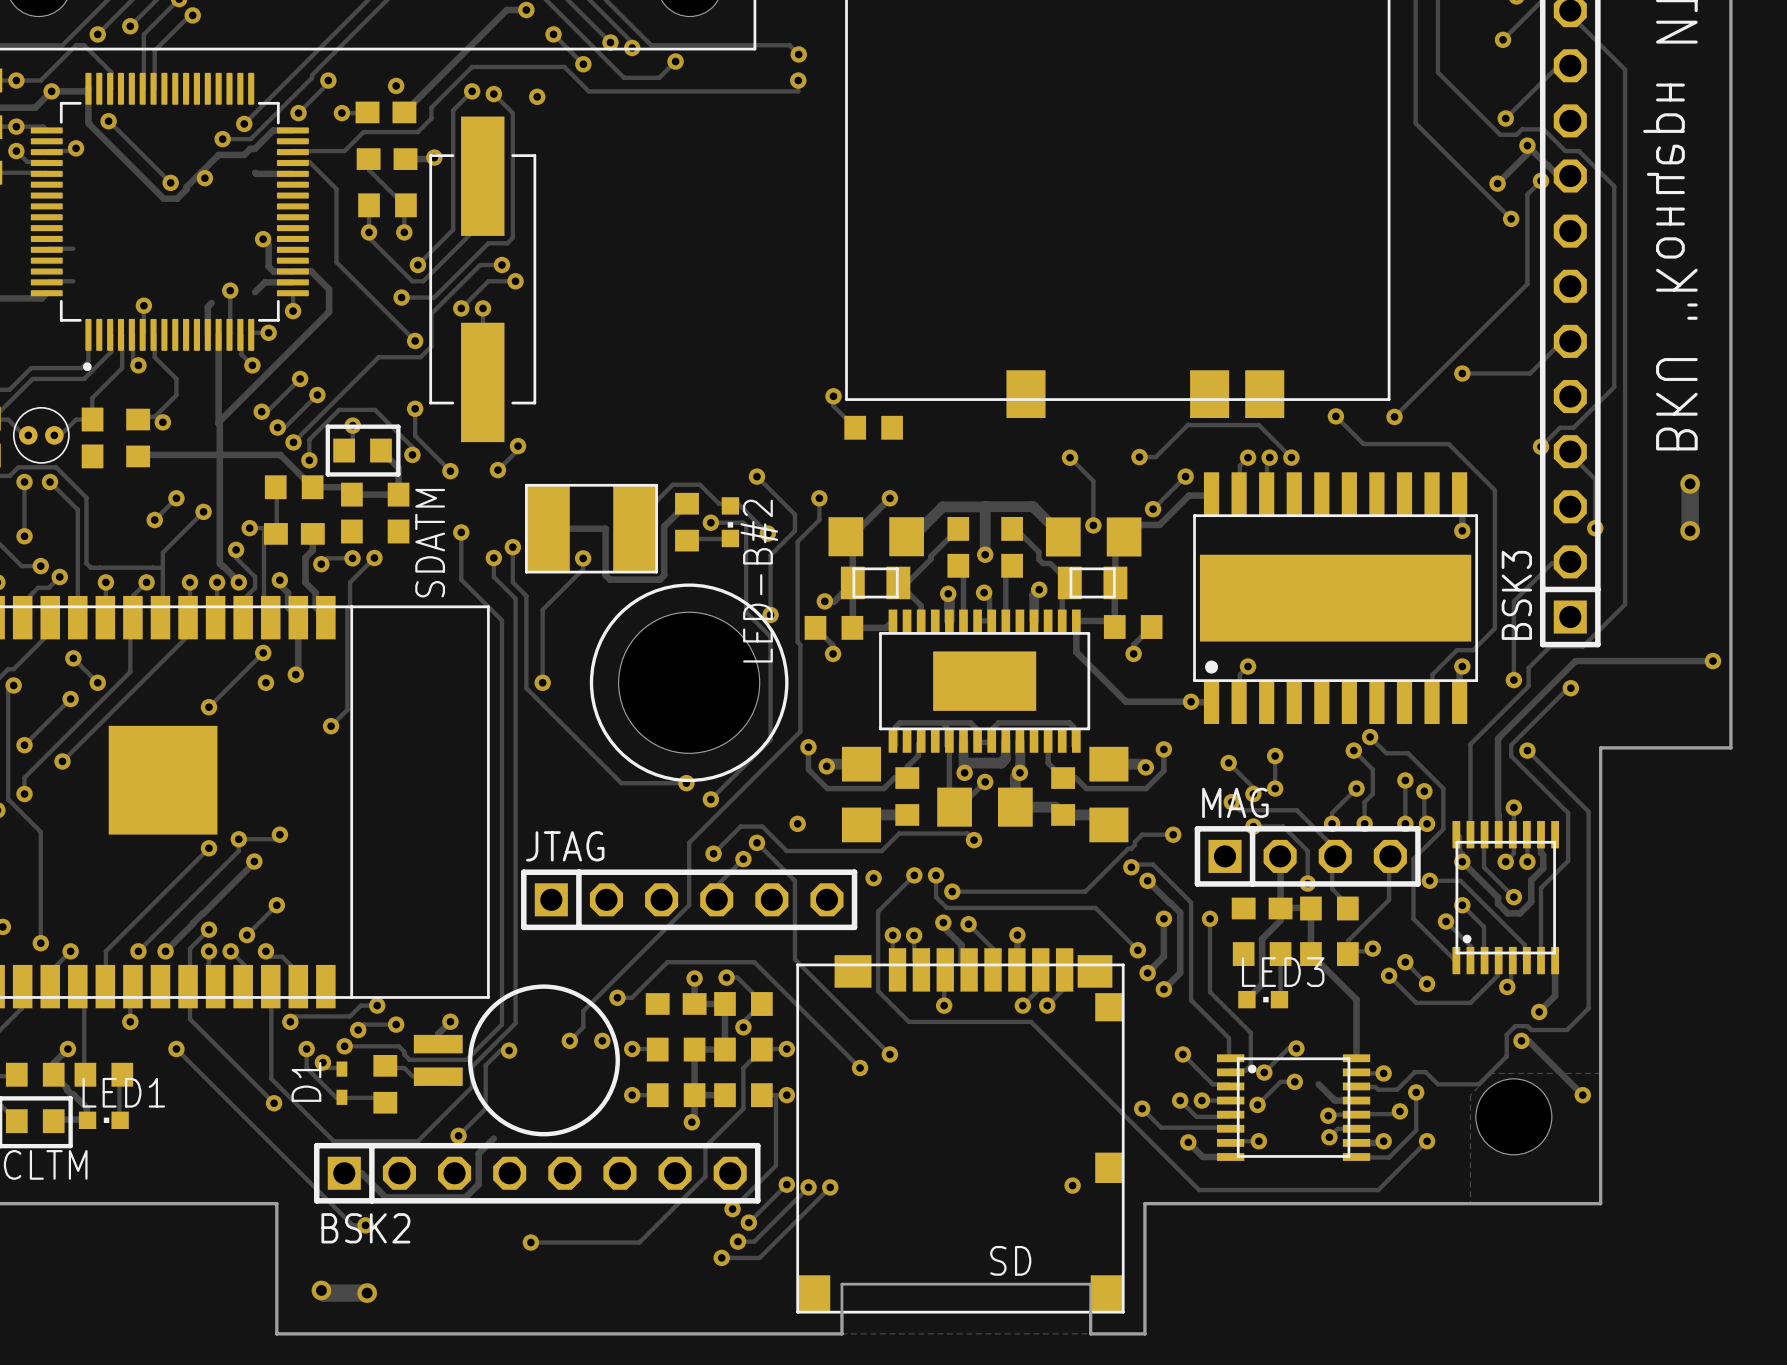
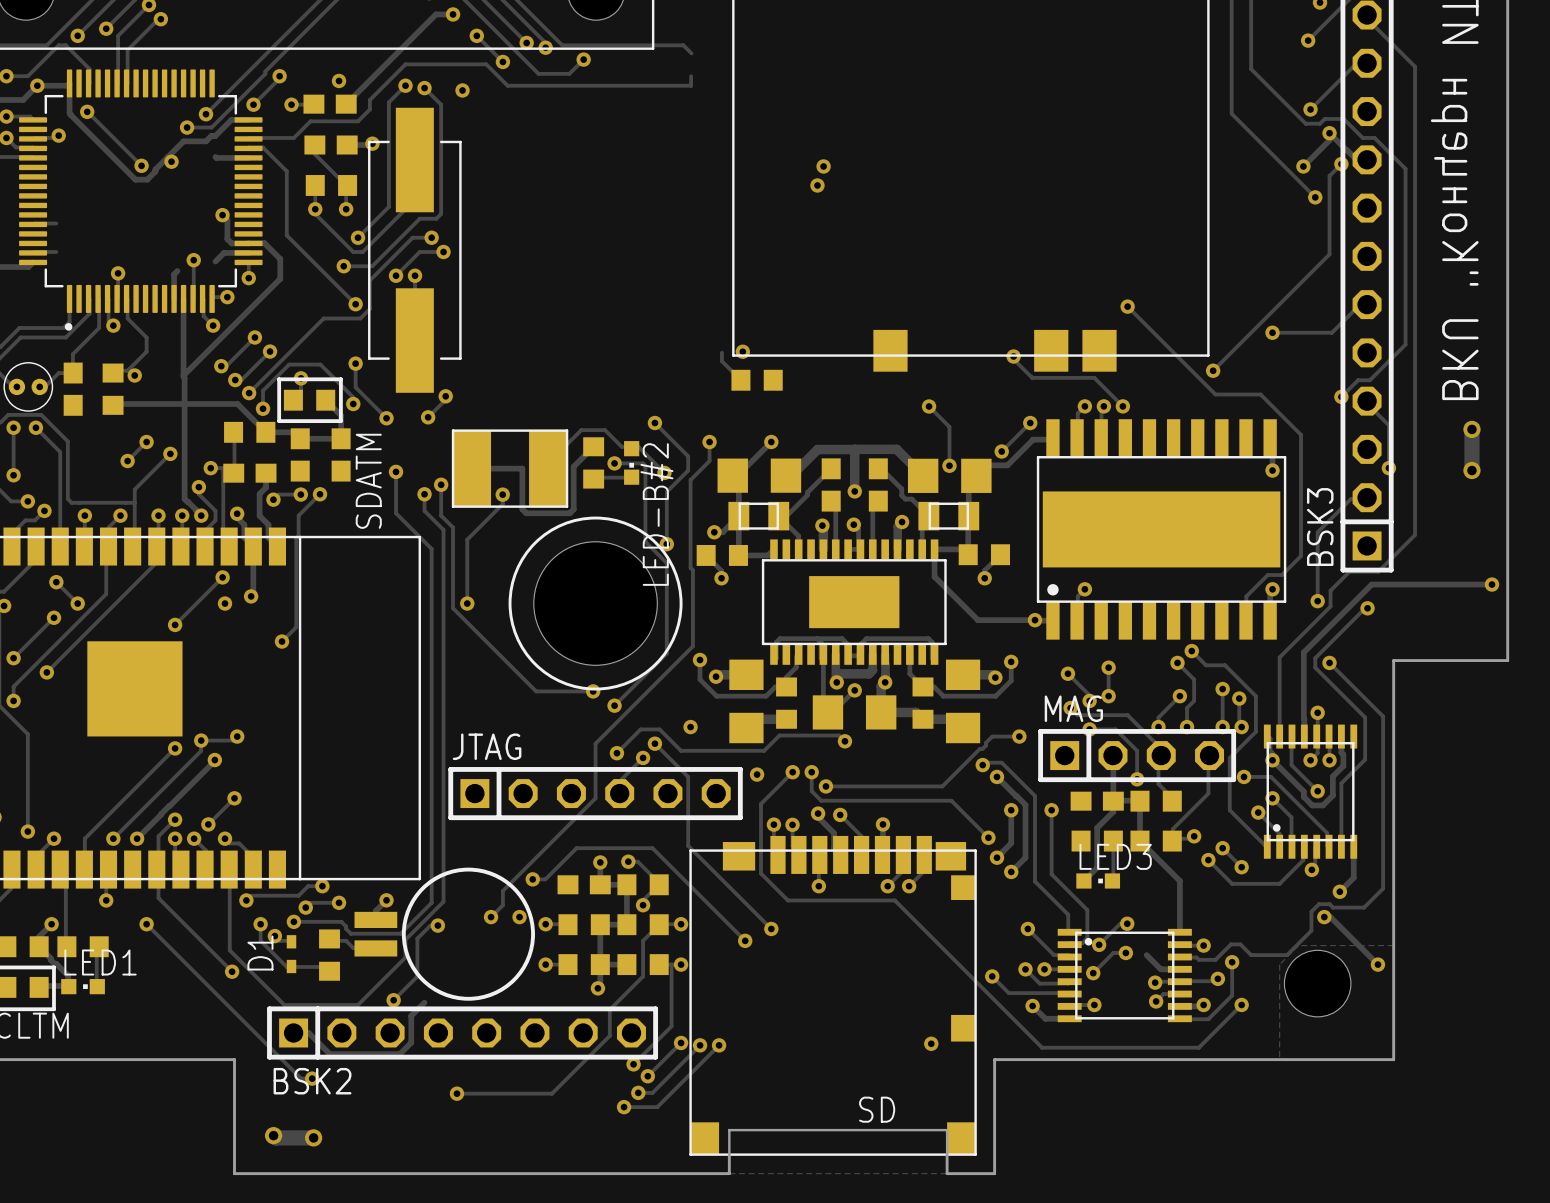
via: (798, 54) -> none
via: (798, 80) -> none
via: none -> (823, 166)
via: none -> (817, 185)
via position: (833, 396) -> (742, 351)
track: (1335, 416) (1363, 444) (1397, 444) -> (1127, 306) (1215, 394)
via position: (1335, 416) -> (1127, 306)
track: (1188, 424) (1155, 457) (1139, 457) -> (1031, 377) (1013, 359) (1013, 356)
via position: (1139, 457) -> (1013, 356)

